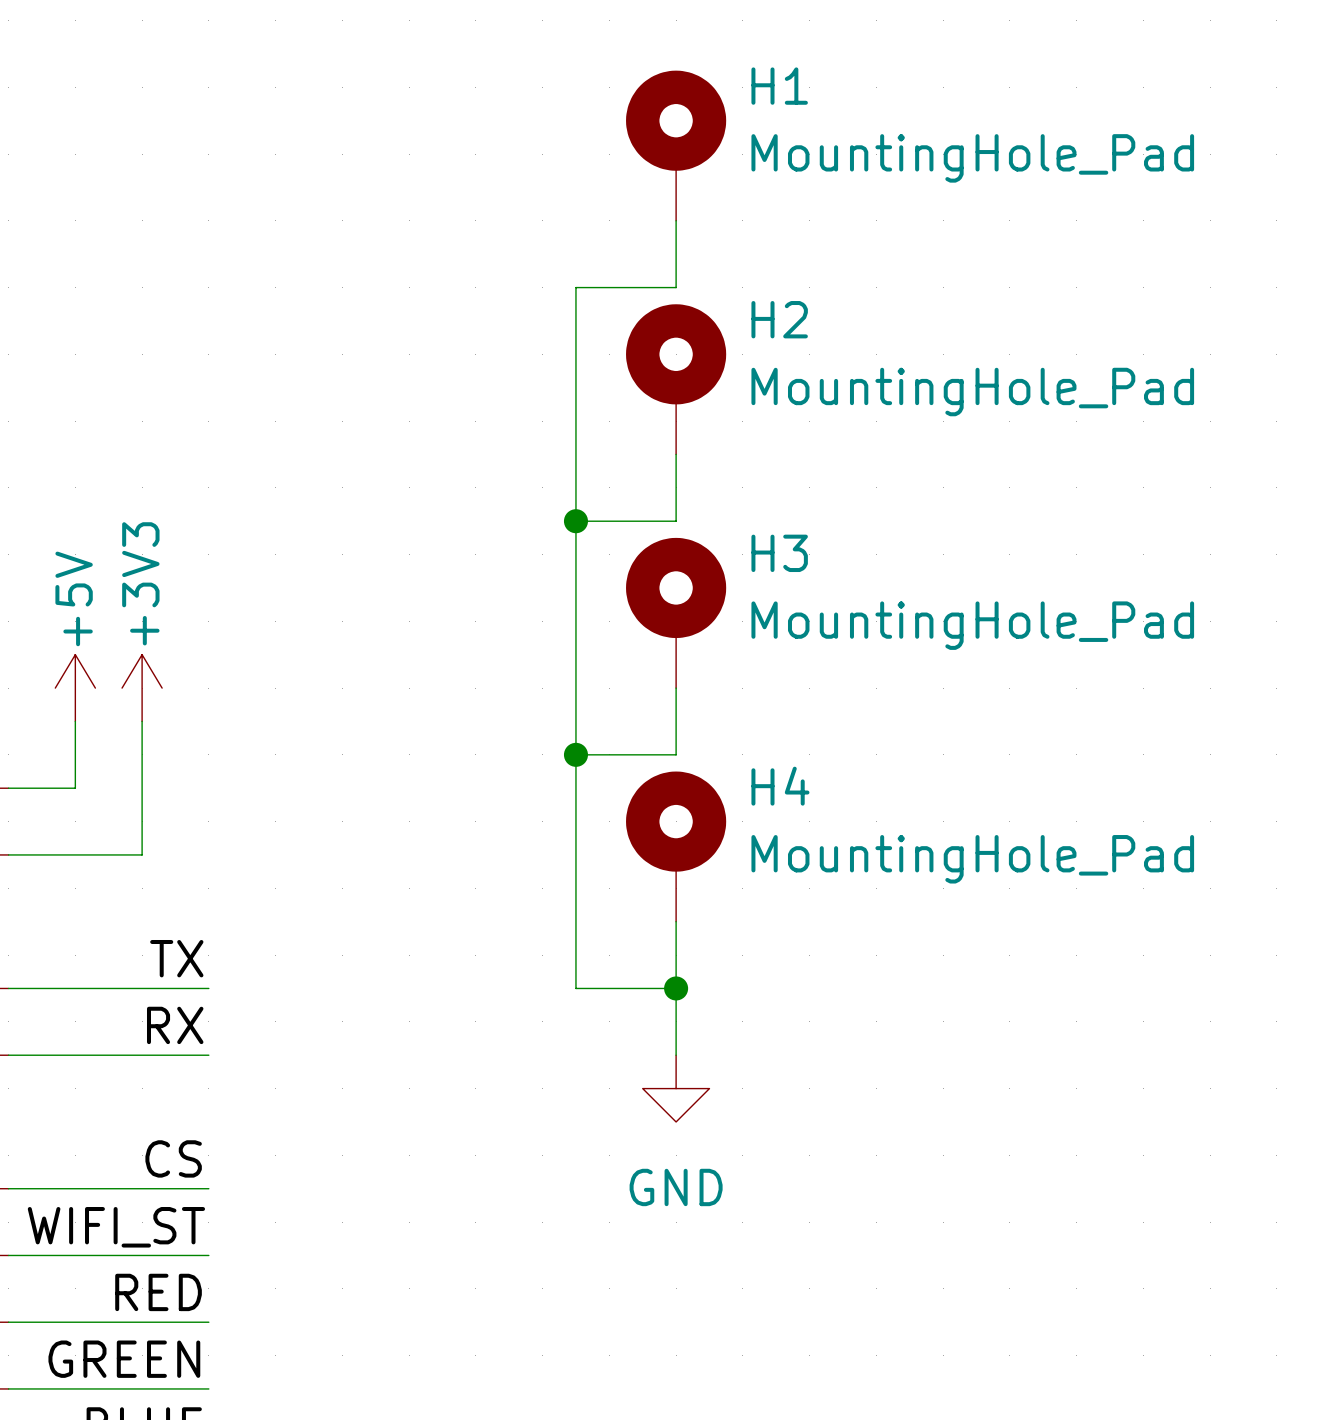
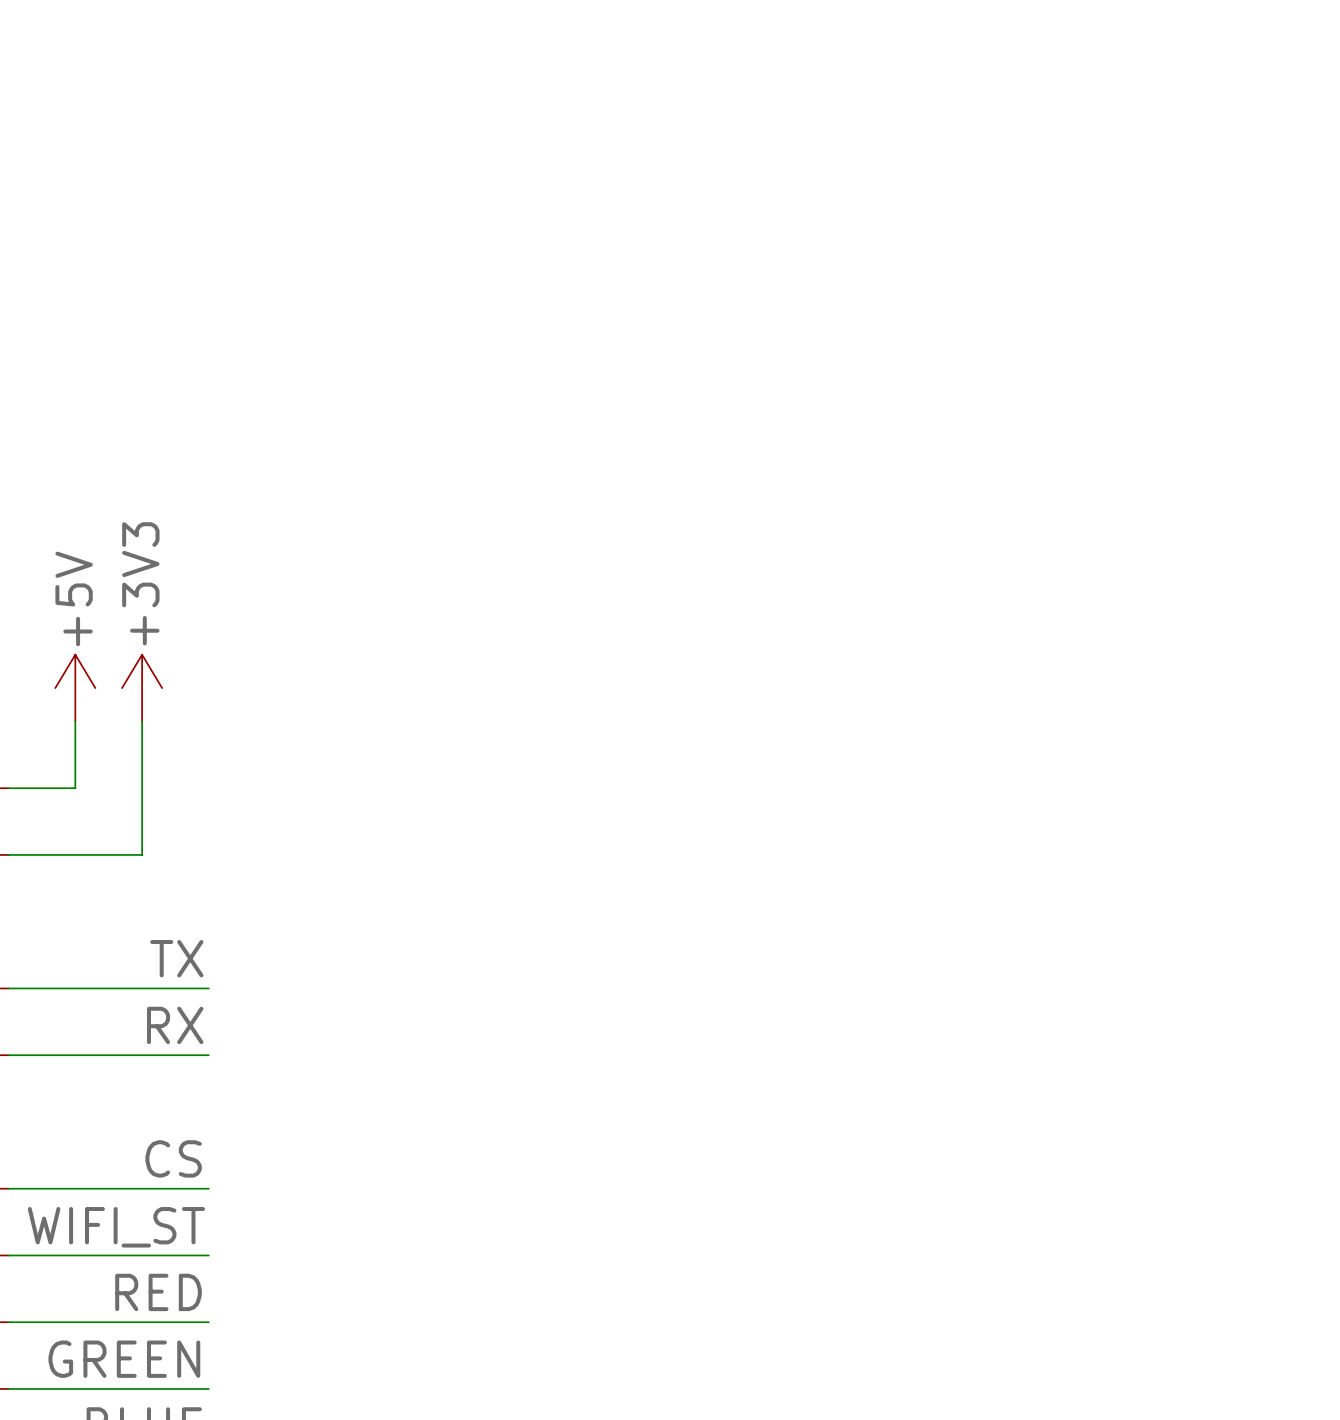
H1: MountingHole_Pad (676, 145) -> none
wire: (676, 220) (676, 287) (575, 287) (575, 988) (676, 988) -> none
H2: MountingHole_Pad (676, 379) -> none
wire: (676, 454) (676, 521) (575, 521) -> none
junction: (575, 521) -> none
H3: MountingHole_Pad (676, 612) -> none
wire: (676, 688) (676, 754) (575, 754) -> none
junction: (575, 754) -> none
H4: MountingHole_Pad (676, 846) -> none
wire: (676, 921) (676, 1055) -> none
junction: (676, 988) -> none
power symbol: GND (676, 1088) -> none

